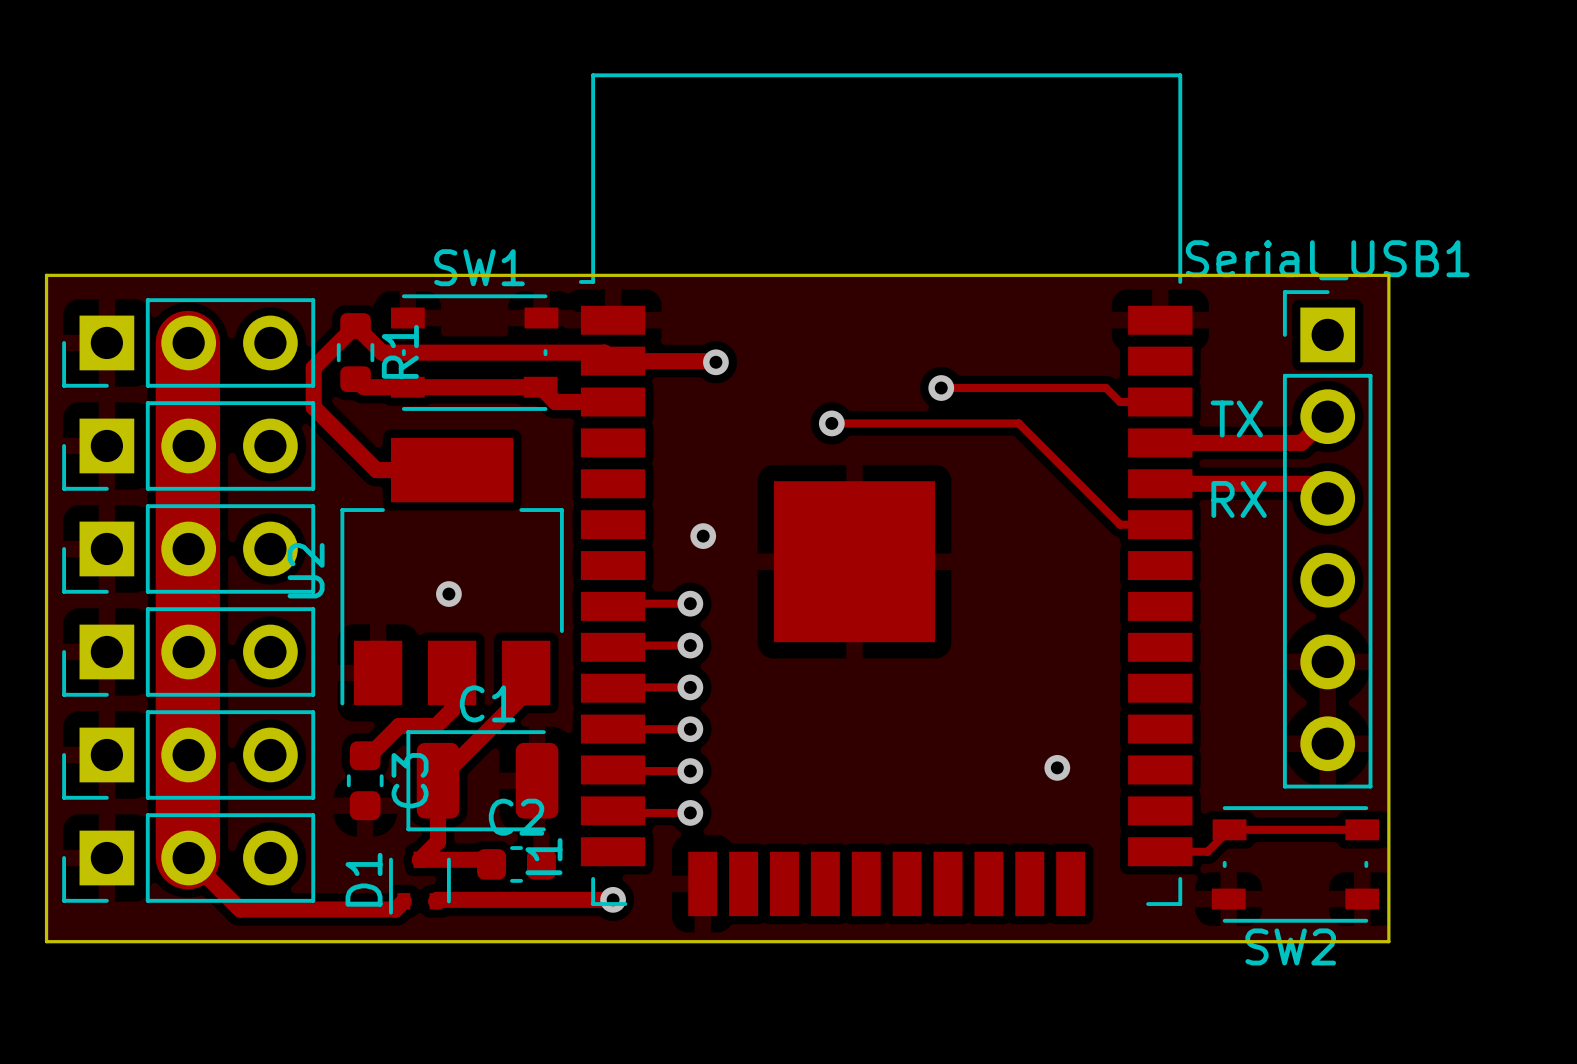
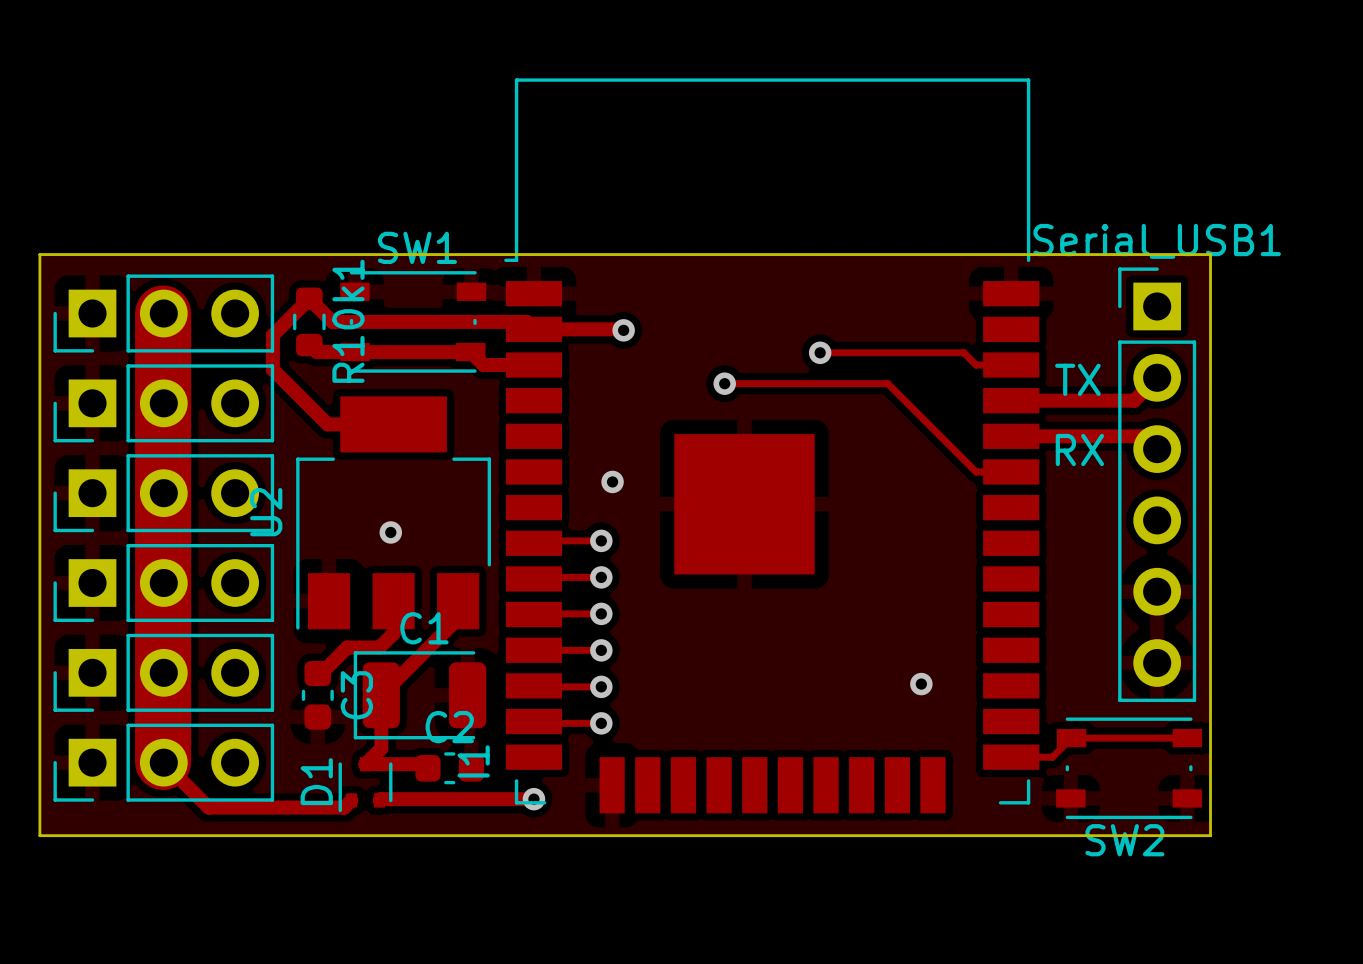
R1 name: R1 (400, 351) -> R10k1 (348, 321)

